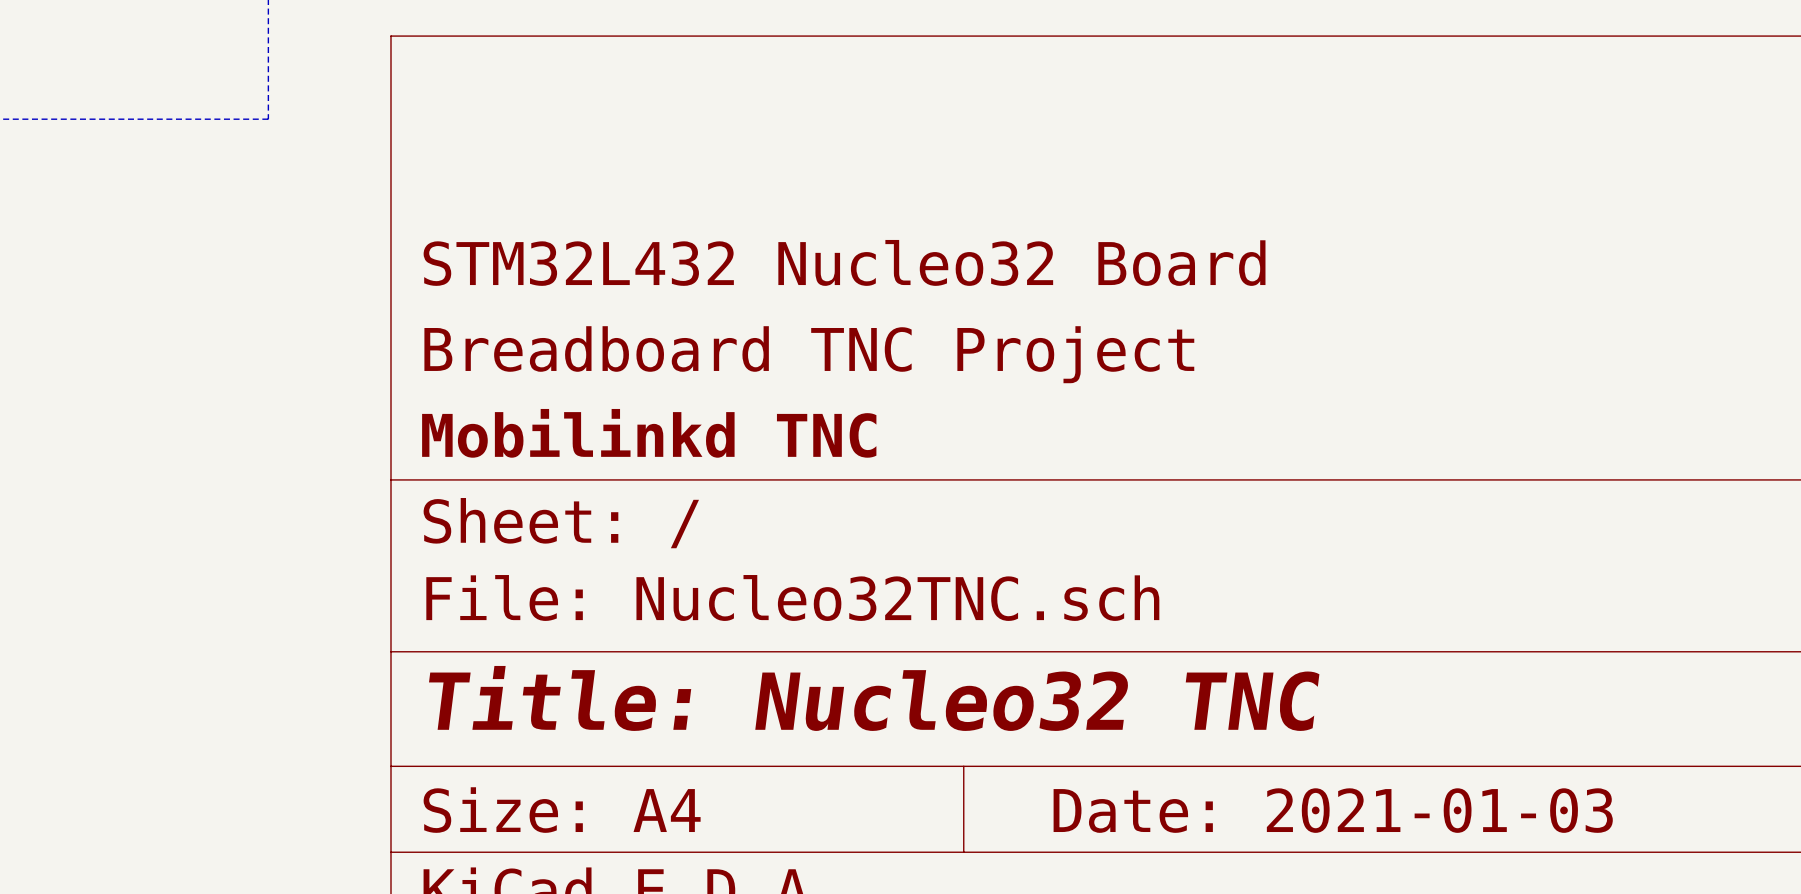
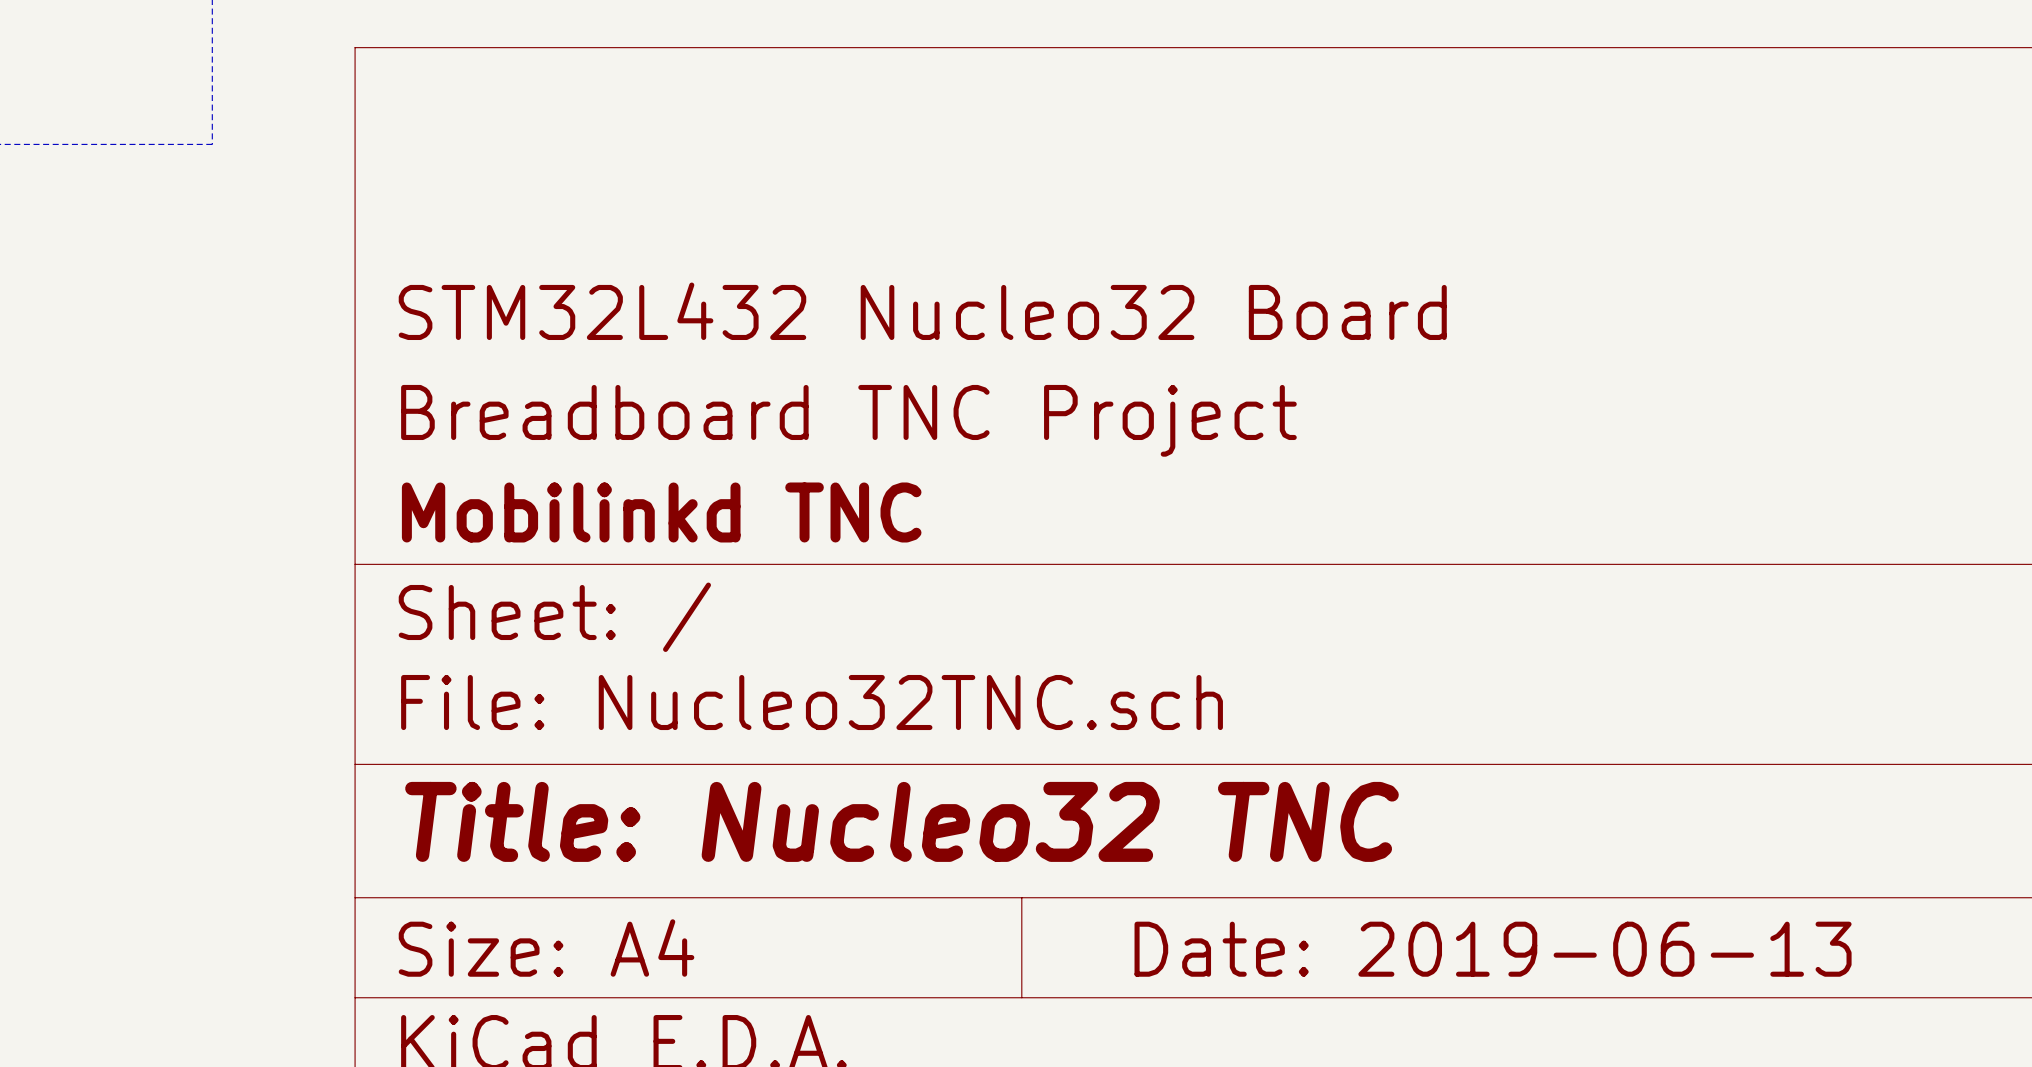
title block: Date: 2021-01-03 (1333, 810) -> Date: 2019-06-13 (1493, 949)

